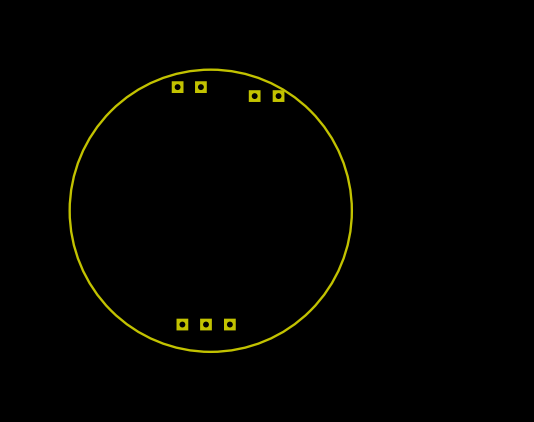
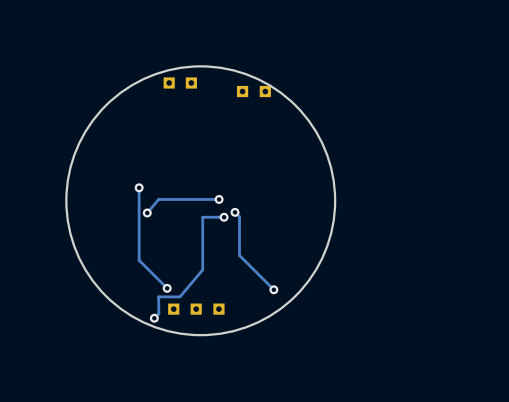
track: none -> (139, 187) (139, 260) (167, 288)
via: none -> (139, 187)
track: none -> (219, 199) (158, 199) (147, 212)
via: none -> (219, 199)
track: none -> (235, 212) (239, 216) (239, 255) (273, 289)
via: none -> (235, 212)
via: none -> (147, 212)
track: none -> (224, 217) (202, 217) (202, 269) (179, 296) (158, 296) (158, 313) (154, 318)
via: none -> (224, 217)
via: none -> (167, 288)
via: none -> (273, 289)
via: none -> (154, 318)

